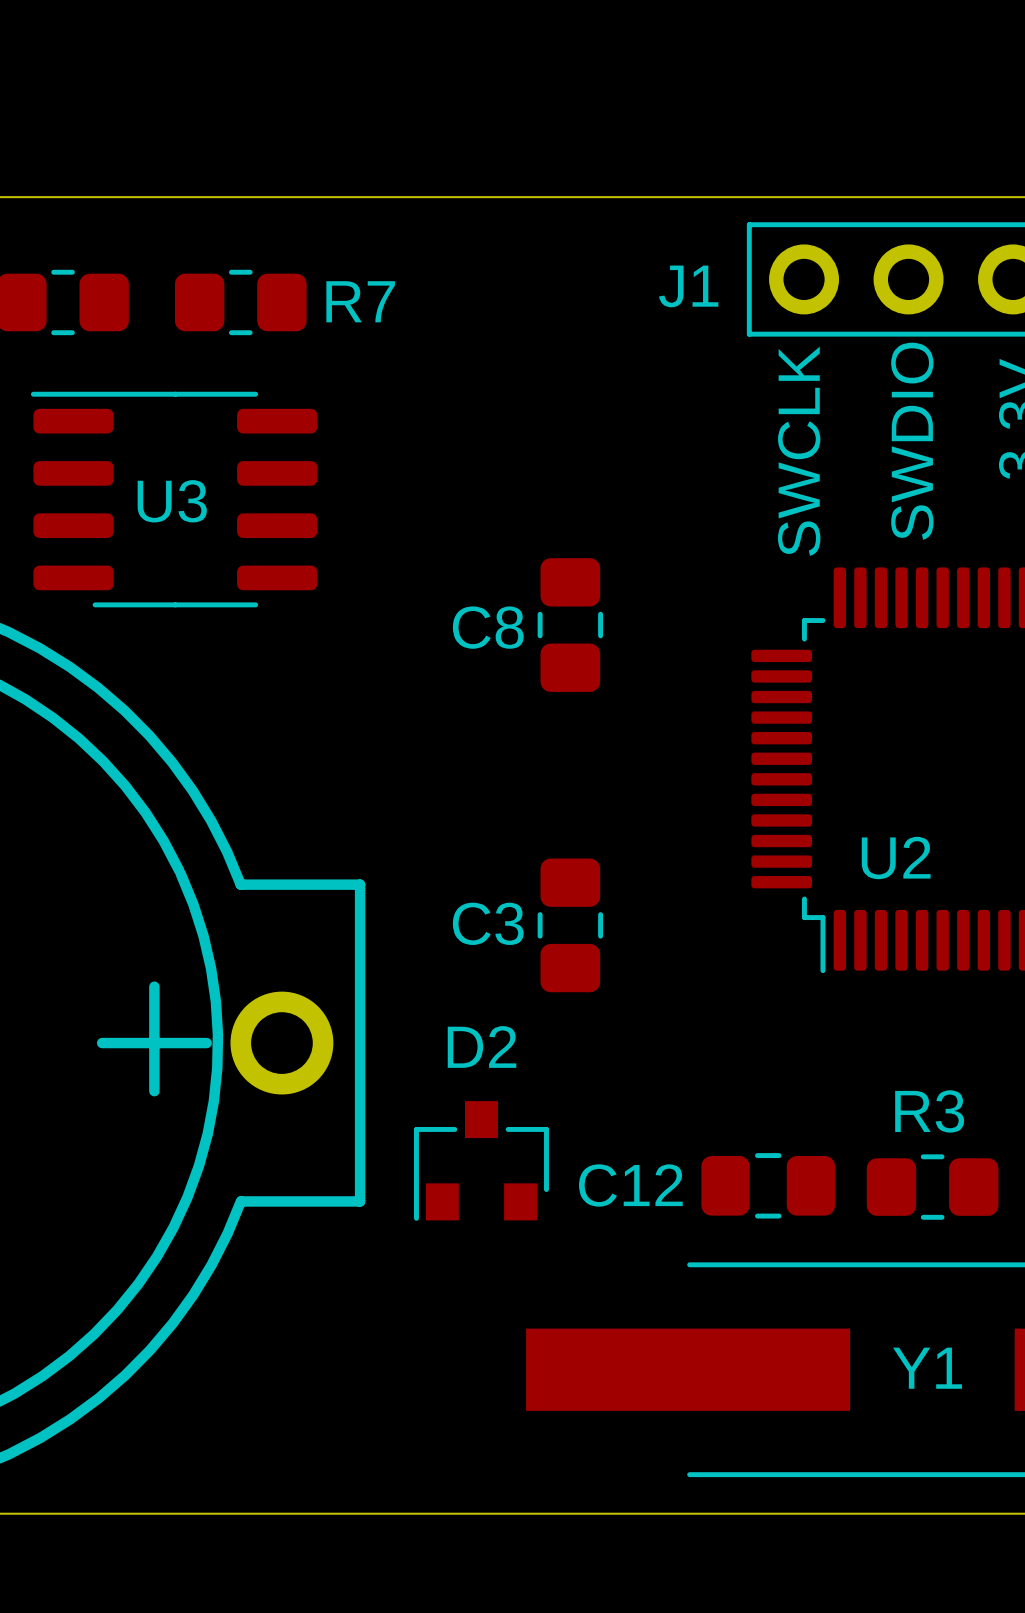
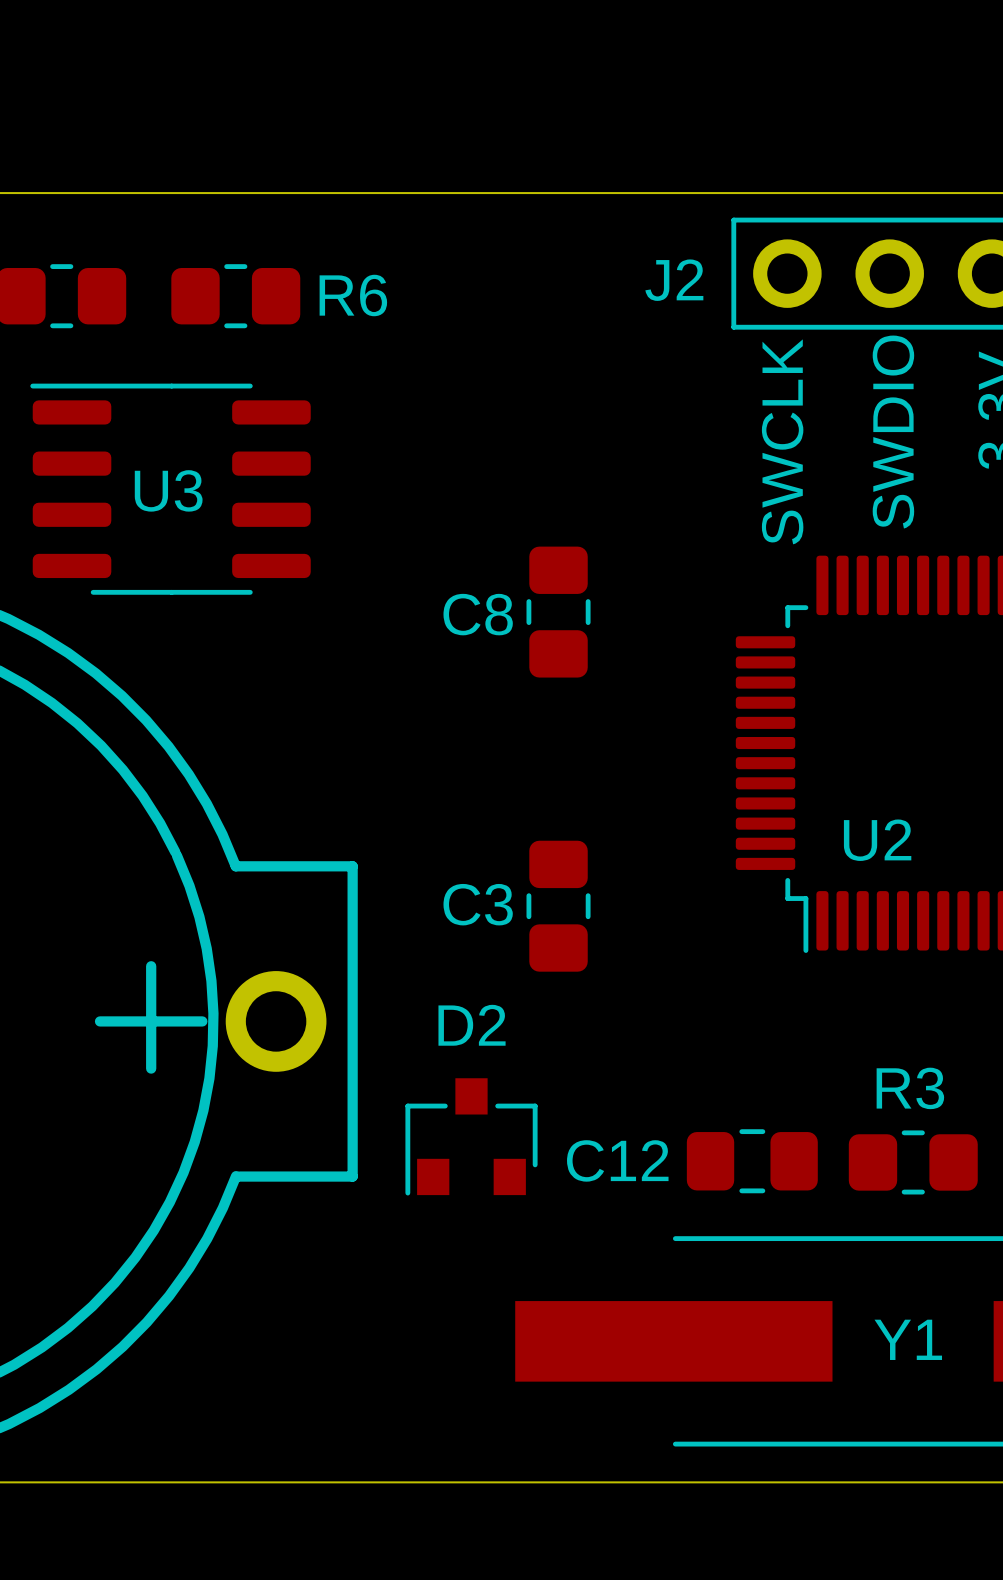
J1 name: J1 (688, 286) -> J2 (674, 280)
R7 name: R7 (360, 301) -> R6 (353, 295)

